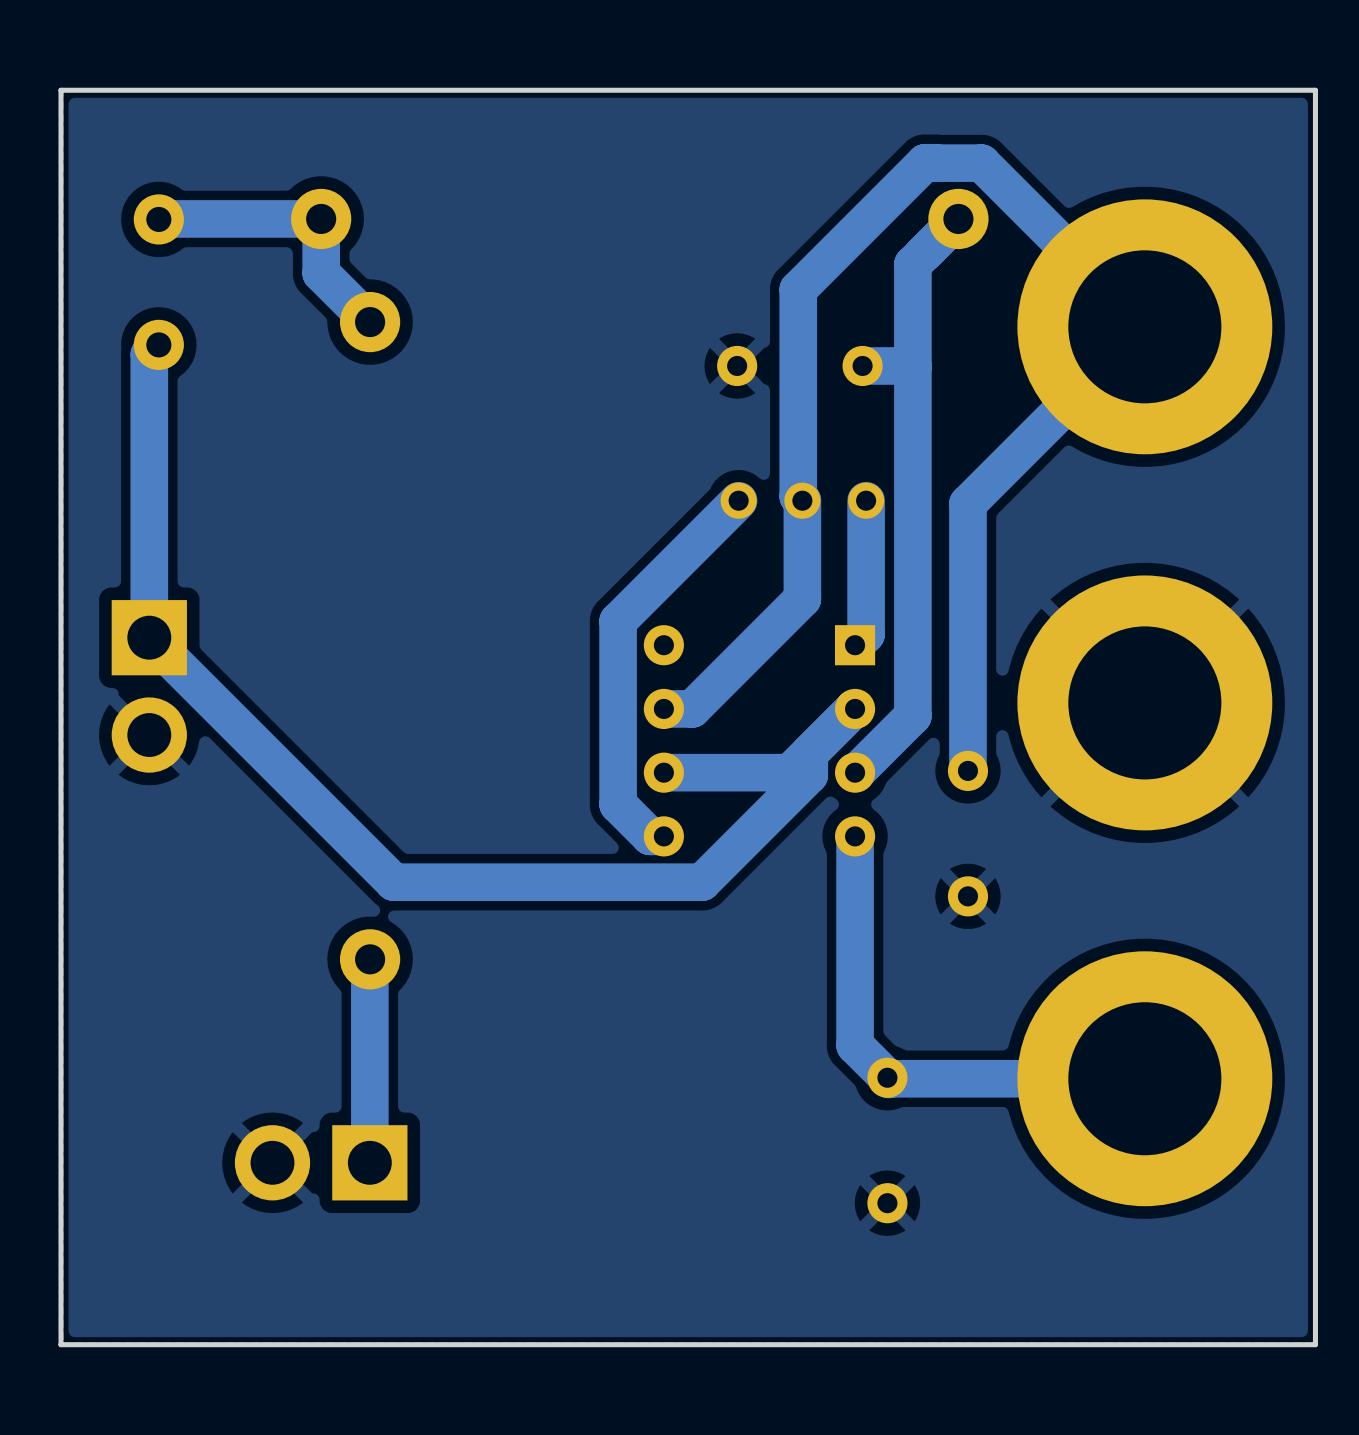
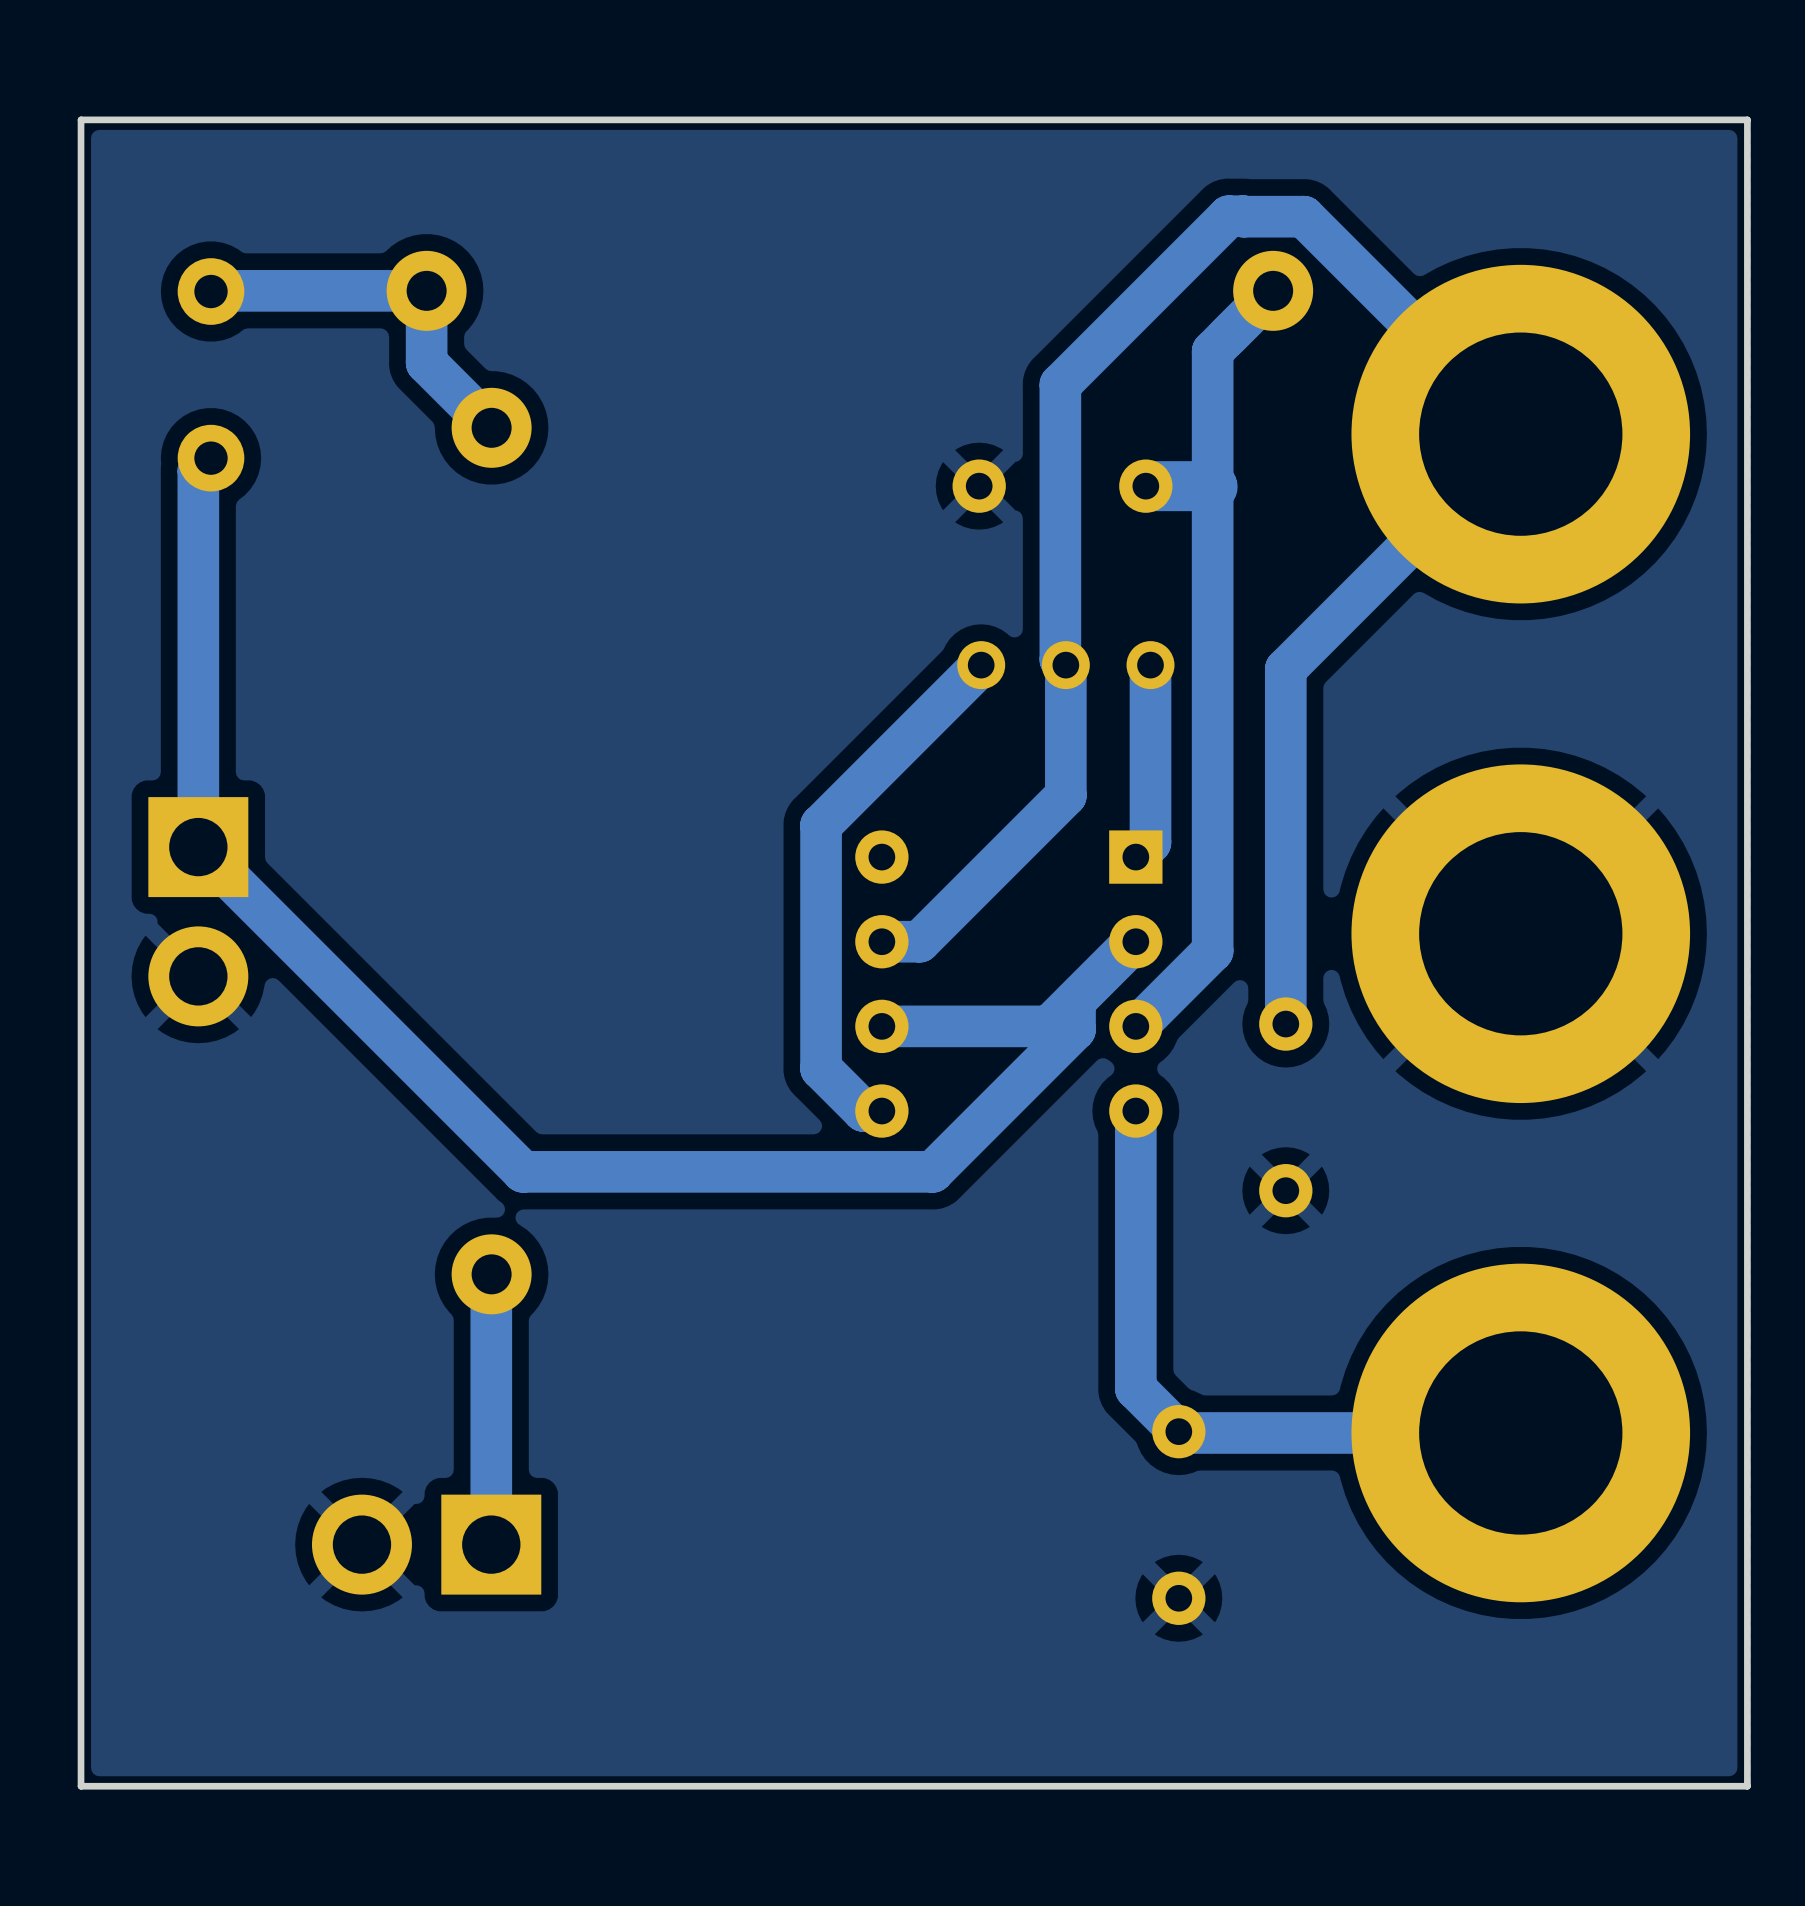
bottom track width: thick (958, 218) (912, 264) (912, 715) (855, 772) -> thin (1273, 290) (1212, 351) (1212, 950) (1135, 1026)
bottom track width: thick (158, 219) (321, 218) (321, 273) (369, 321) -> thin (211, 291) (426, 290) (426, 362) (490, 427)
bottom track width: thick (1144, 326) (981, 163) (925, 162) (798, 289) (798, 496) (802, 500) (802, 598) (692, 708) (663, 708) -> thin (1520, 433) (1303, 216) (1228, 216) (1060, 384) (1060, 659) (1065, 665) (1065, 795) (919, 941) (881, 941)
bottom track width: thick (1144, 326) (967, 503) (967, 770) -> thin (1520, 434) (1285, 669) (1285, 1024)
bottom track width: thick (158, 344) (149, 354) (149, 637) (393, 882) (702, 882) (809, 775) (809, 753) (854, 708) -> thin (211, 458) (198, 470) (198, 847) (523, 1171) (932, 1171) (1075, 1029) (1075, 1001) (1134, 941)
bottom track width: thick (738, 500) (618, 621) (618, 804) (650, 836) (663, 836) -> thin (981, 665) (821, 825) (821, 1068) (863, 1111) (881, 1111)
bottom track width: thick (866, 500) (866, 634) (855, 645) -> thin (1150, 665) (1150, 842) (1135, 857)
bottom track width: thick (855, 708) (789, 772) (663, 772) -> thin (1135, 941) (1049, 1026) (881, 1026)
bottom track width: thick (855, 836) (855, 1045) (889, 1079) -> thin (1135, 1111) (1135, 1388) (1181, 1433)
bottom track width: thick (369, 959) (369, 1162) -> thin (491, 1274) (491, 1544)
bottom track width: thick (1144, 1078) (888, 1078) -> thin (1520, 1432) (1180, 1432)

